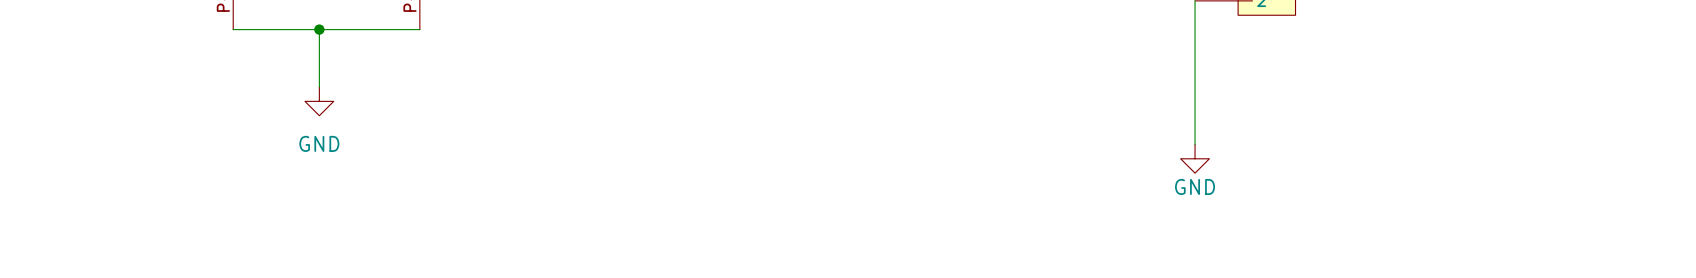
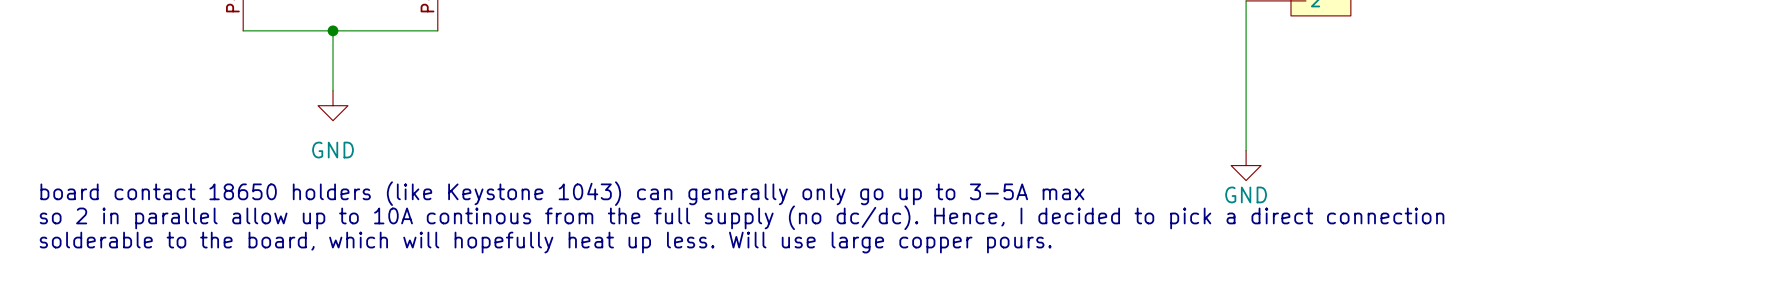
text: none -> board contact 18650 holders (like Keystone 1043) can generally only go up to 3-5A max (562, 193)
text: none -> so 2 in parallel allow up to 10A continous from the full supply (no dc/dc). Hence, I decided to pick a direct connection (742, 217)
text: none -> solderable to the board, which will hopefully heat up less. Will use large copper pours. (545, 242)

